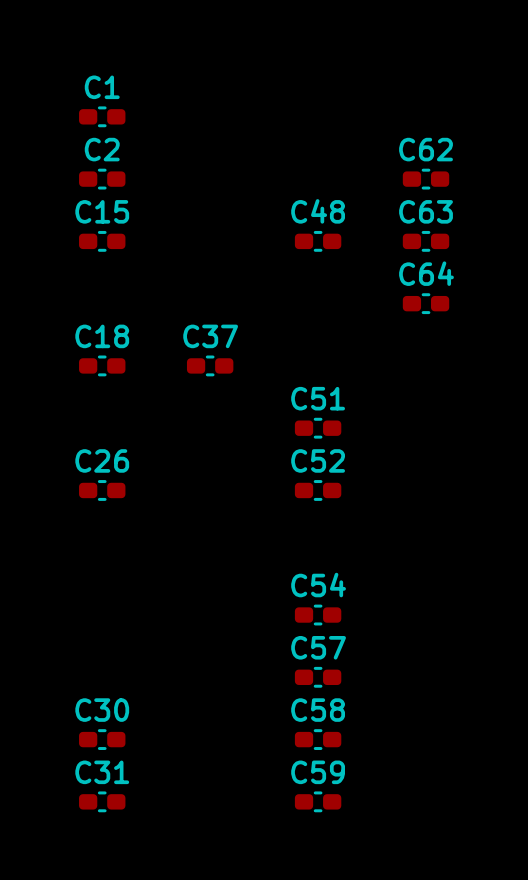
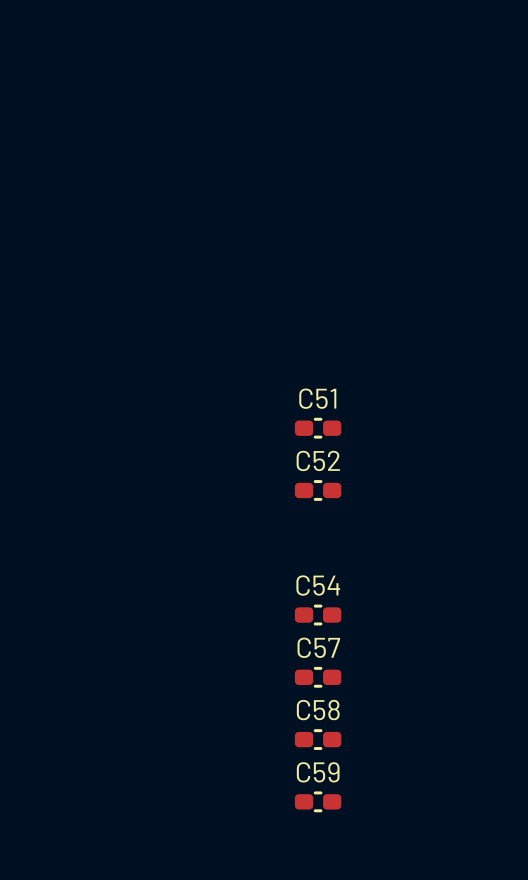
C1: (102, 116) -> none
C2: (102, 179) -> none
C62: (426, 179) -> none
C15: (102, 241) -> none
C48: (318, 241) -> none
C63: (426, 241) -> none
C64: (426, 303) -> none
C18: (102, 365) -> none
C37: (210, 365) -> none
C26: (102, 490) -> none
C30: (102, 739) -> none
C31: (102, 801) -> none

